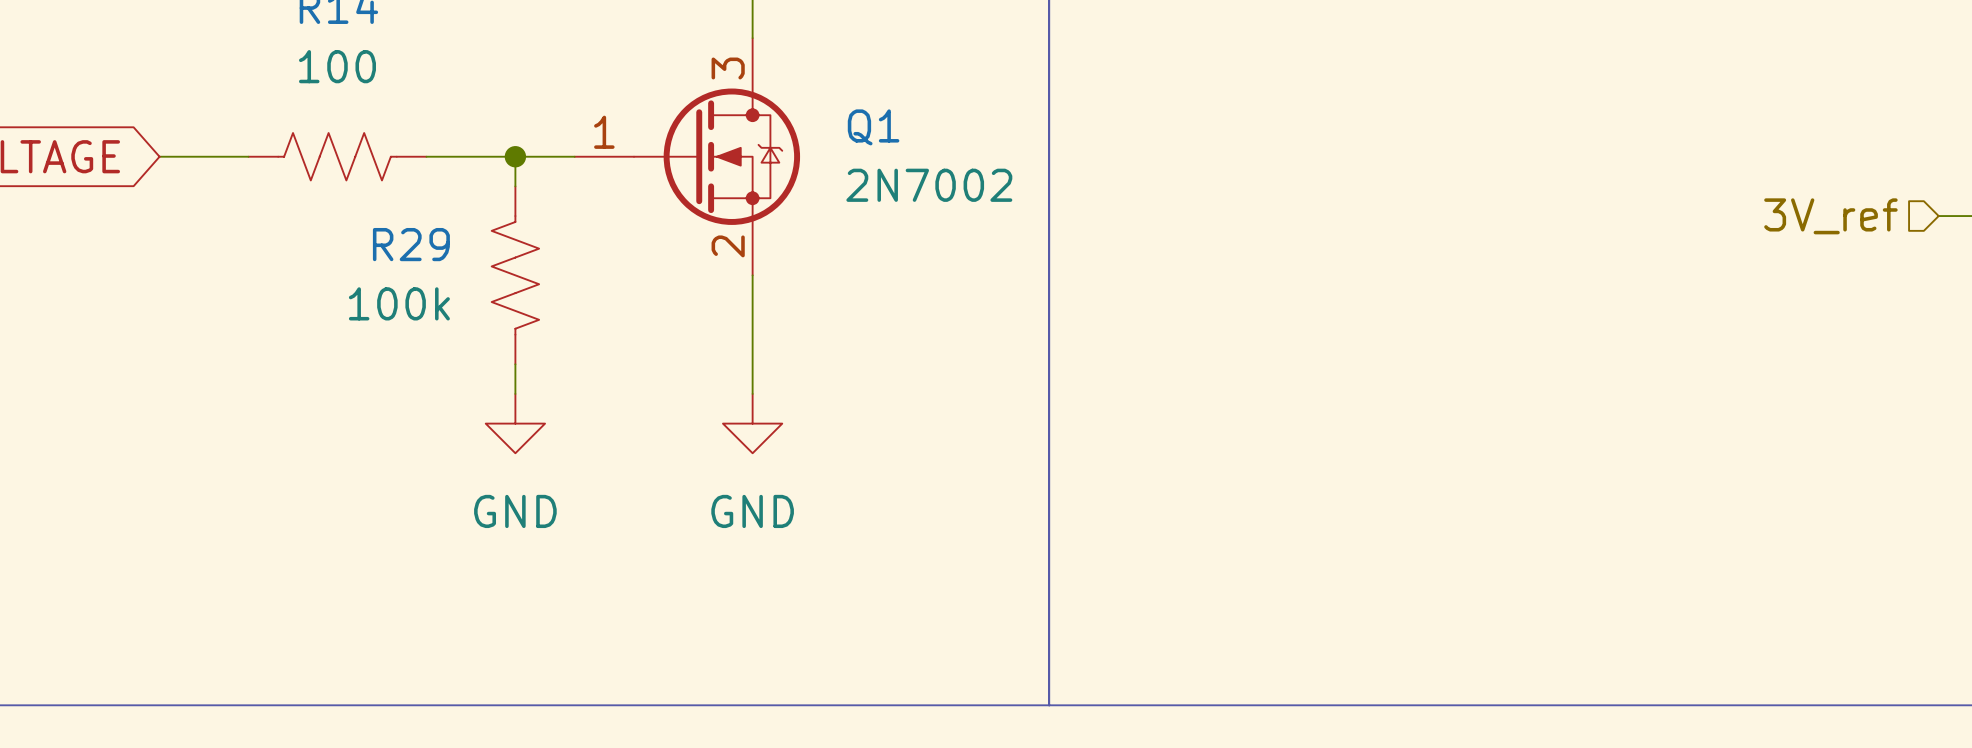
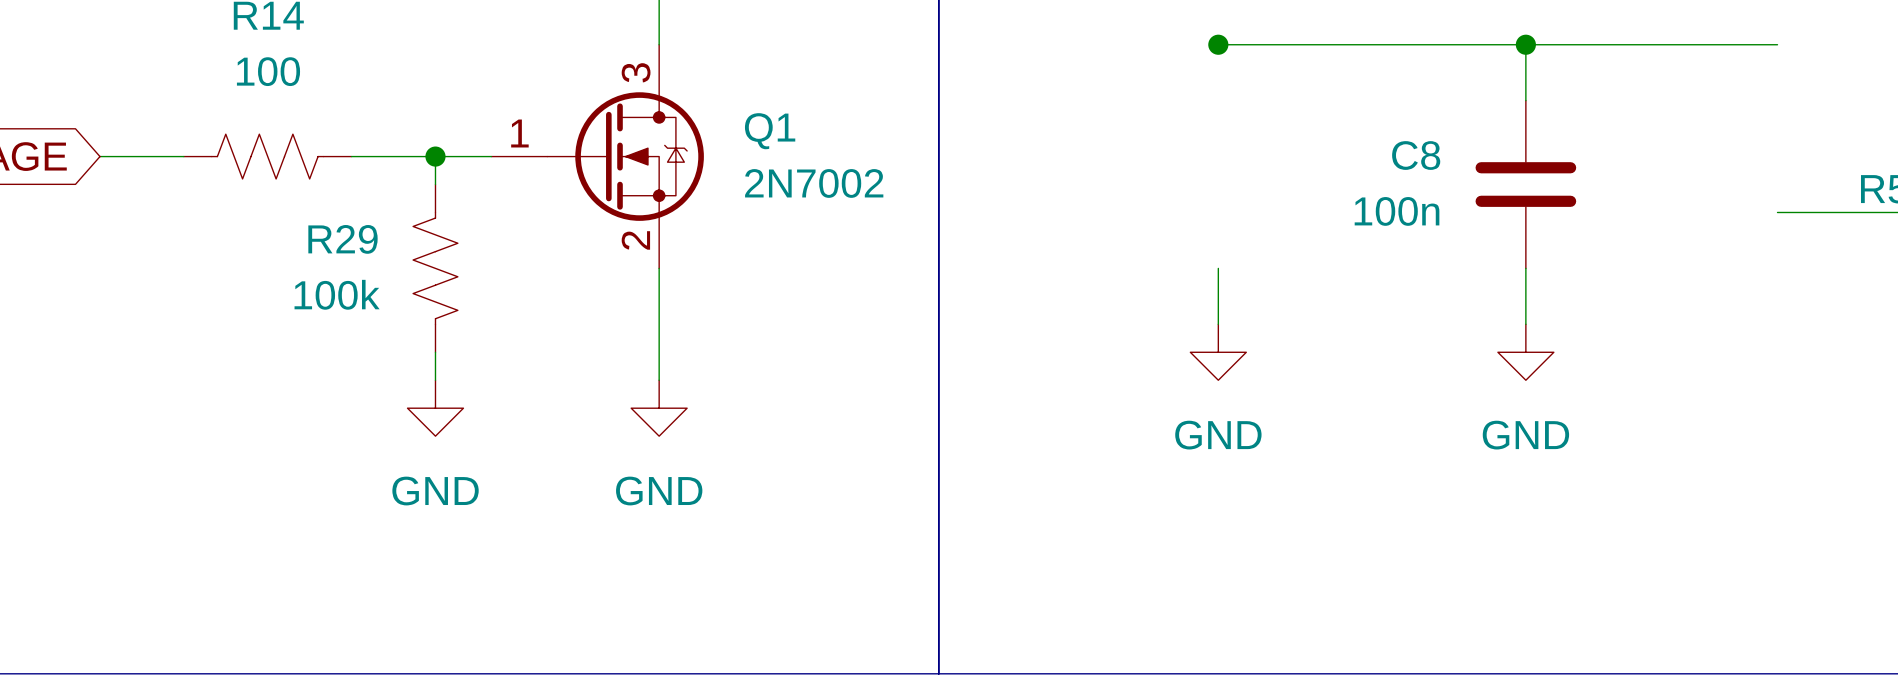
wire: none -> (1218, 44) (1777, 44)
junction: none -> (1218, 44)
wire: none -> (1525, 44) (1525, 100)
junction: none -> (1525, 44)
C8: none -> 100n (1525, 184)
hierarchical label: 3V_ref (1830, 216) -> none
wire: none -> (1218, 268) (1218, 324)
wire: none -> (1525, 268) (1525, 324)
power symbol: none -> GND (1218, 352)
power symbol: none -> GND (1525, 352)

